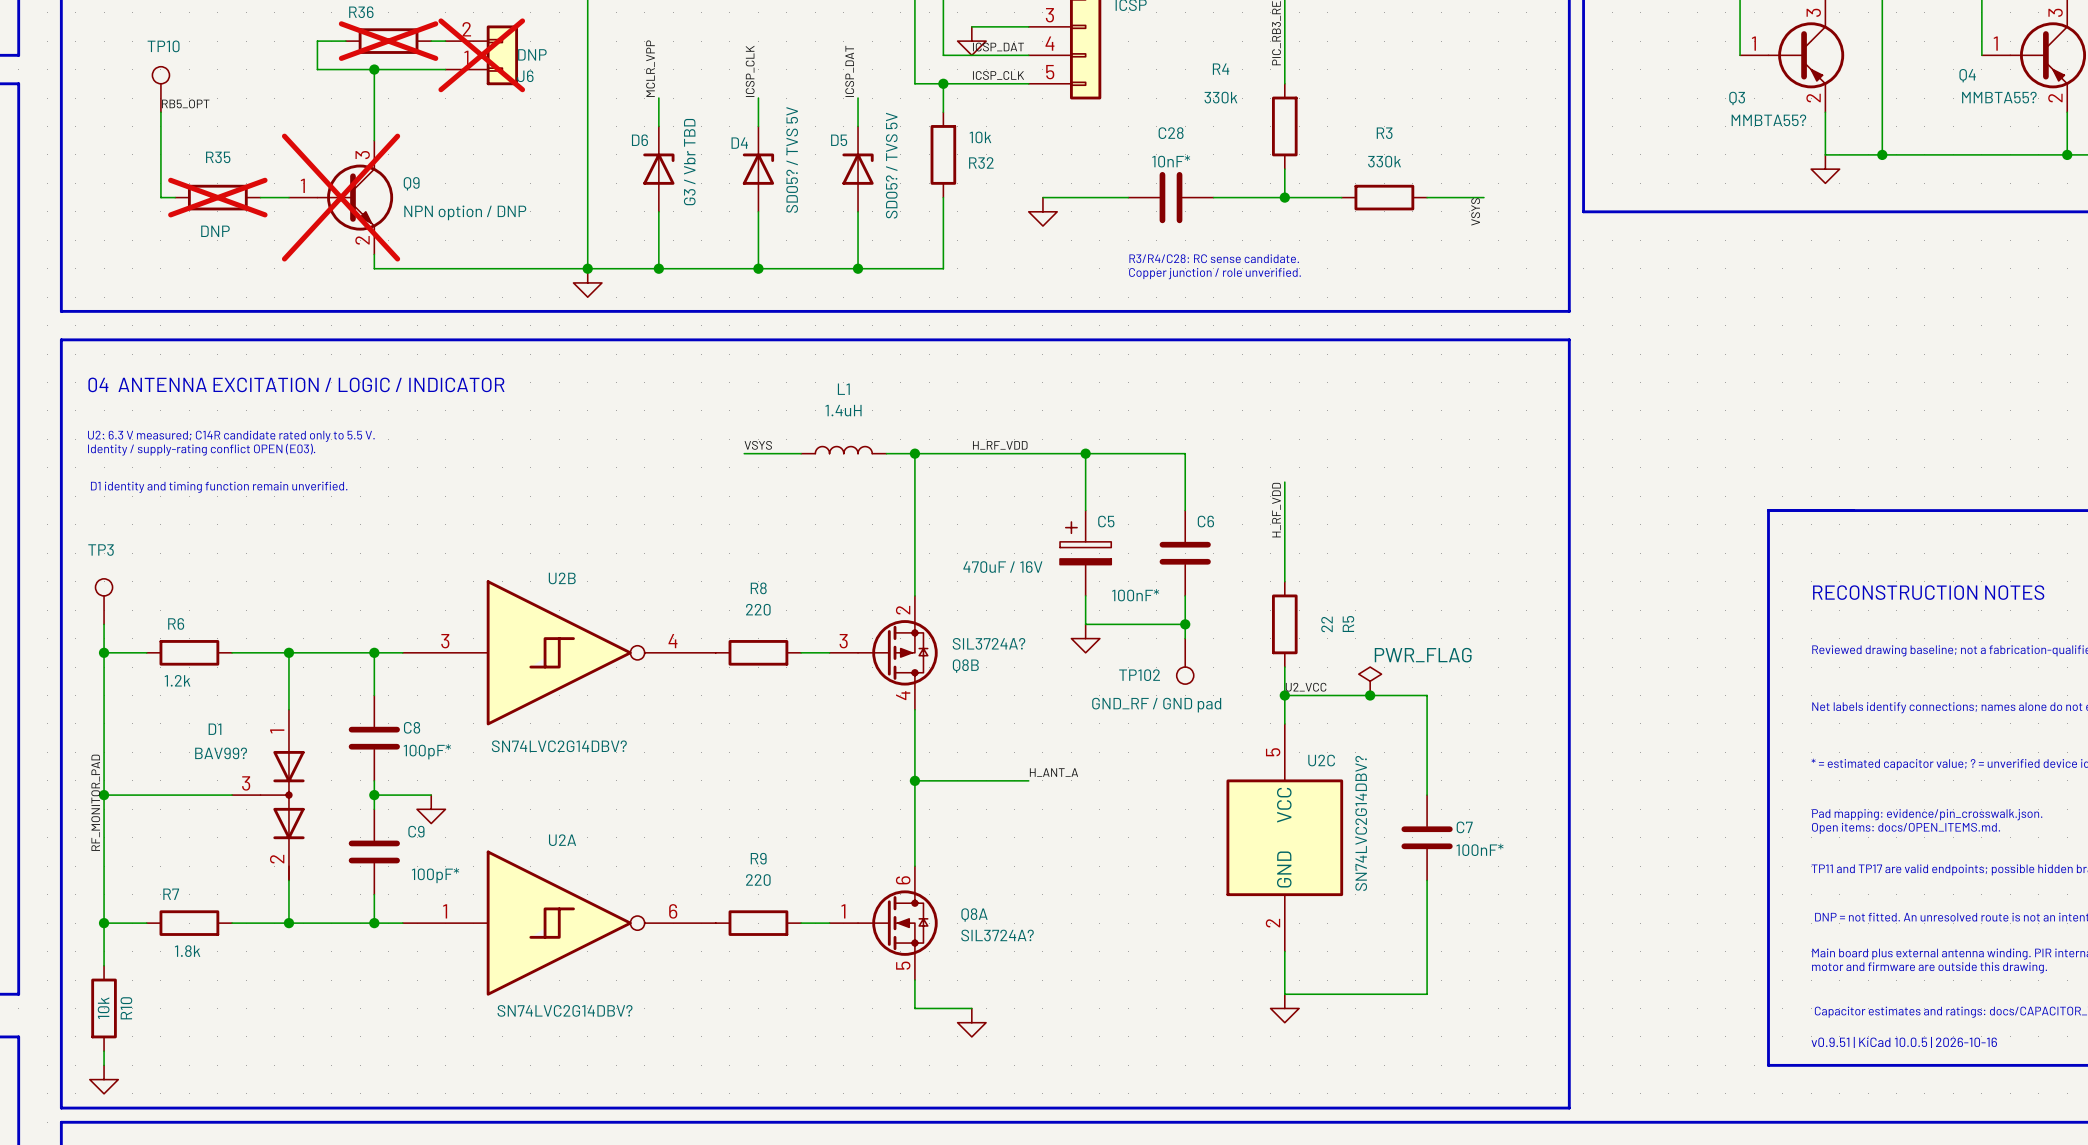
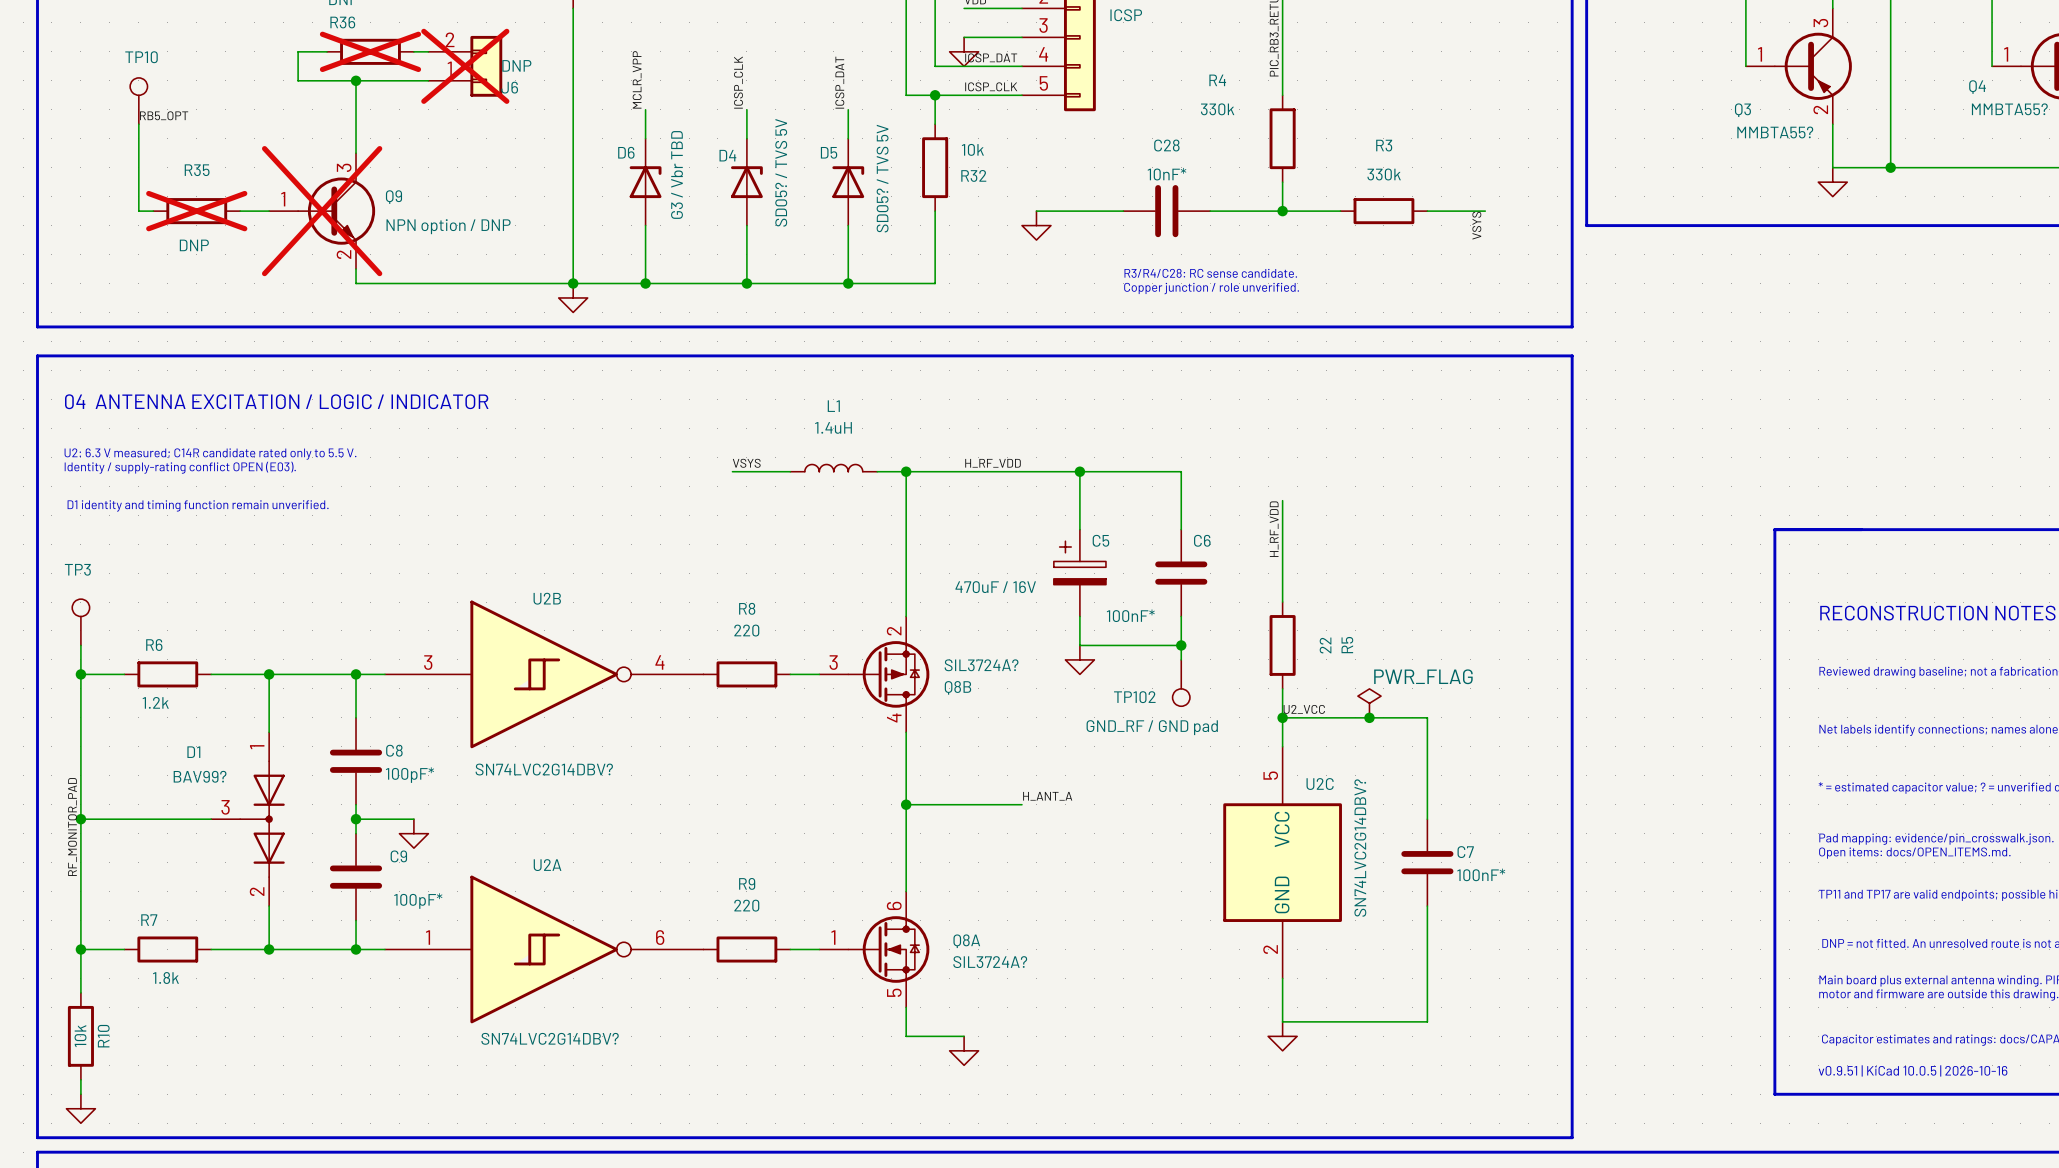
D1 symbol: [232, 709, 305, 881] -> [211, 732, 285, 907]

